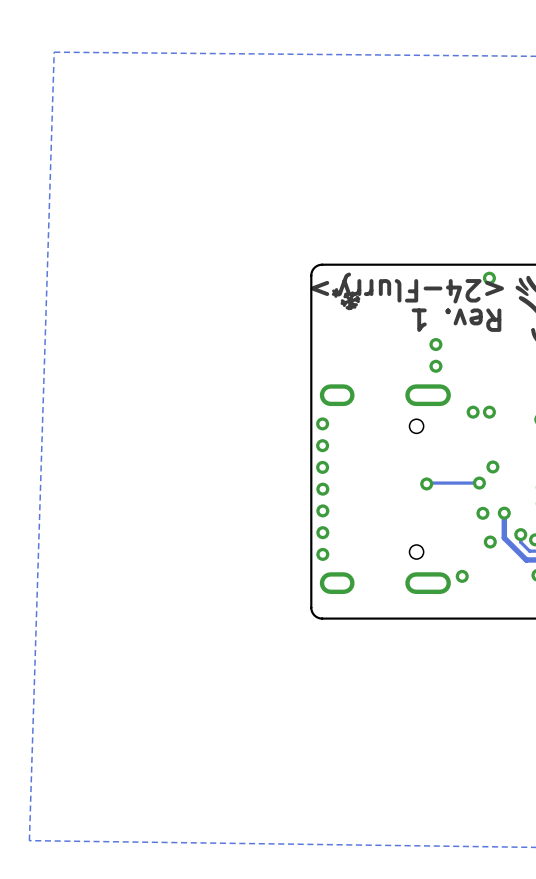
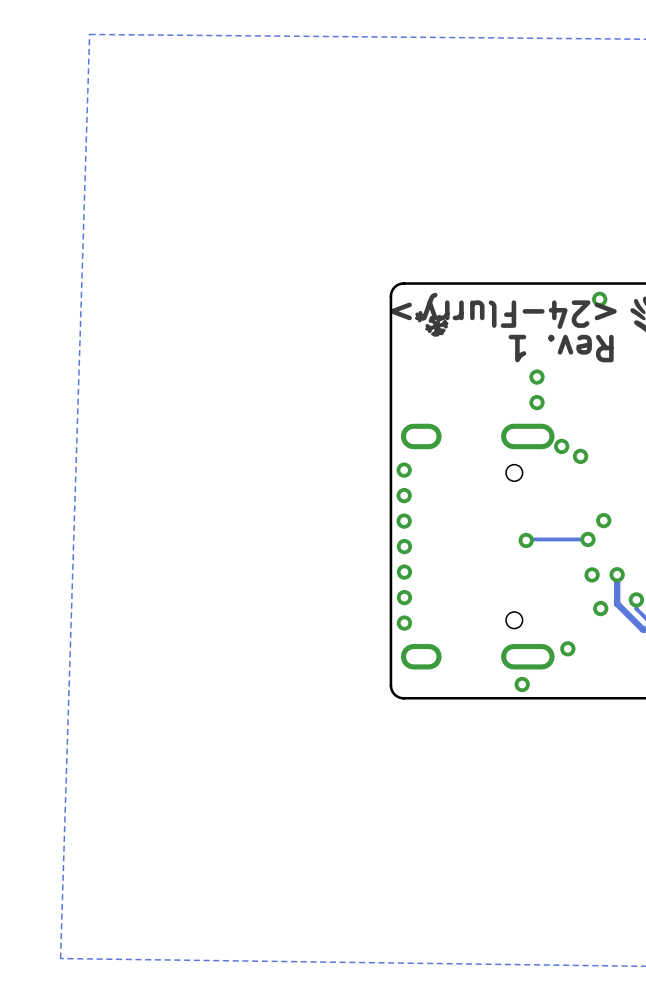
via position: (489, 412) -> (561, 446)
via: none -> (522, 684)

